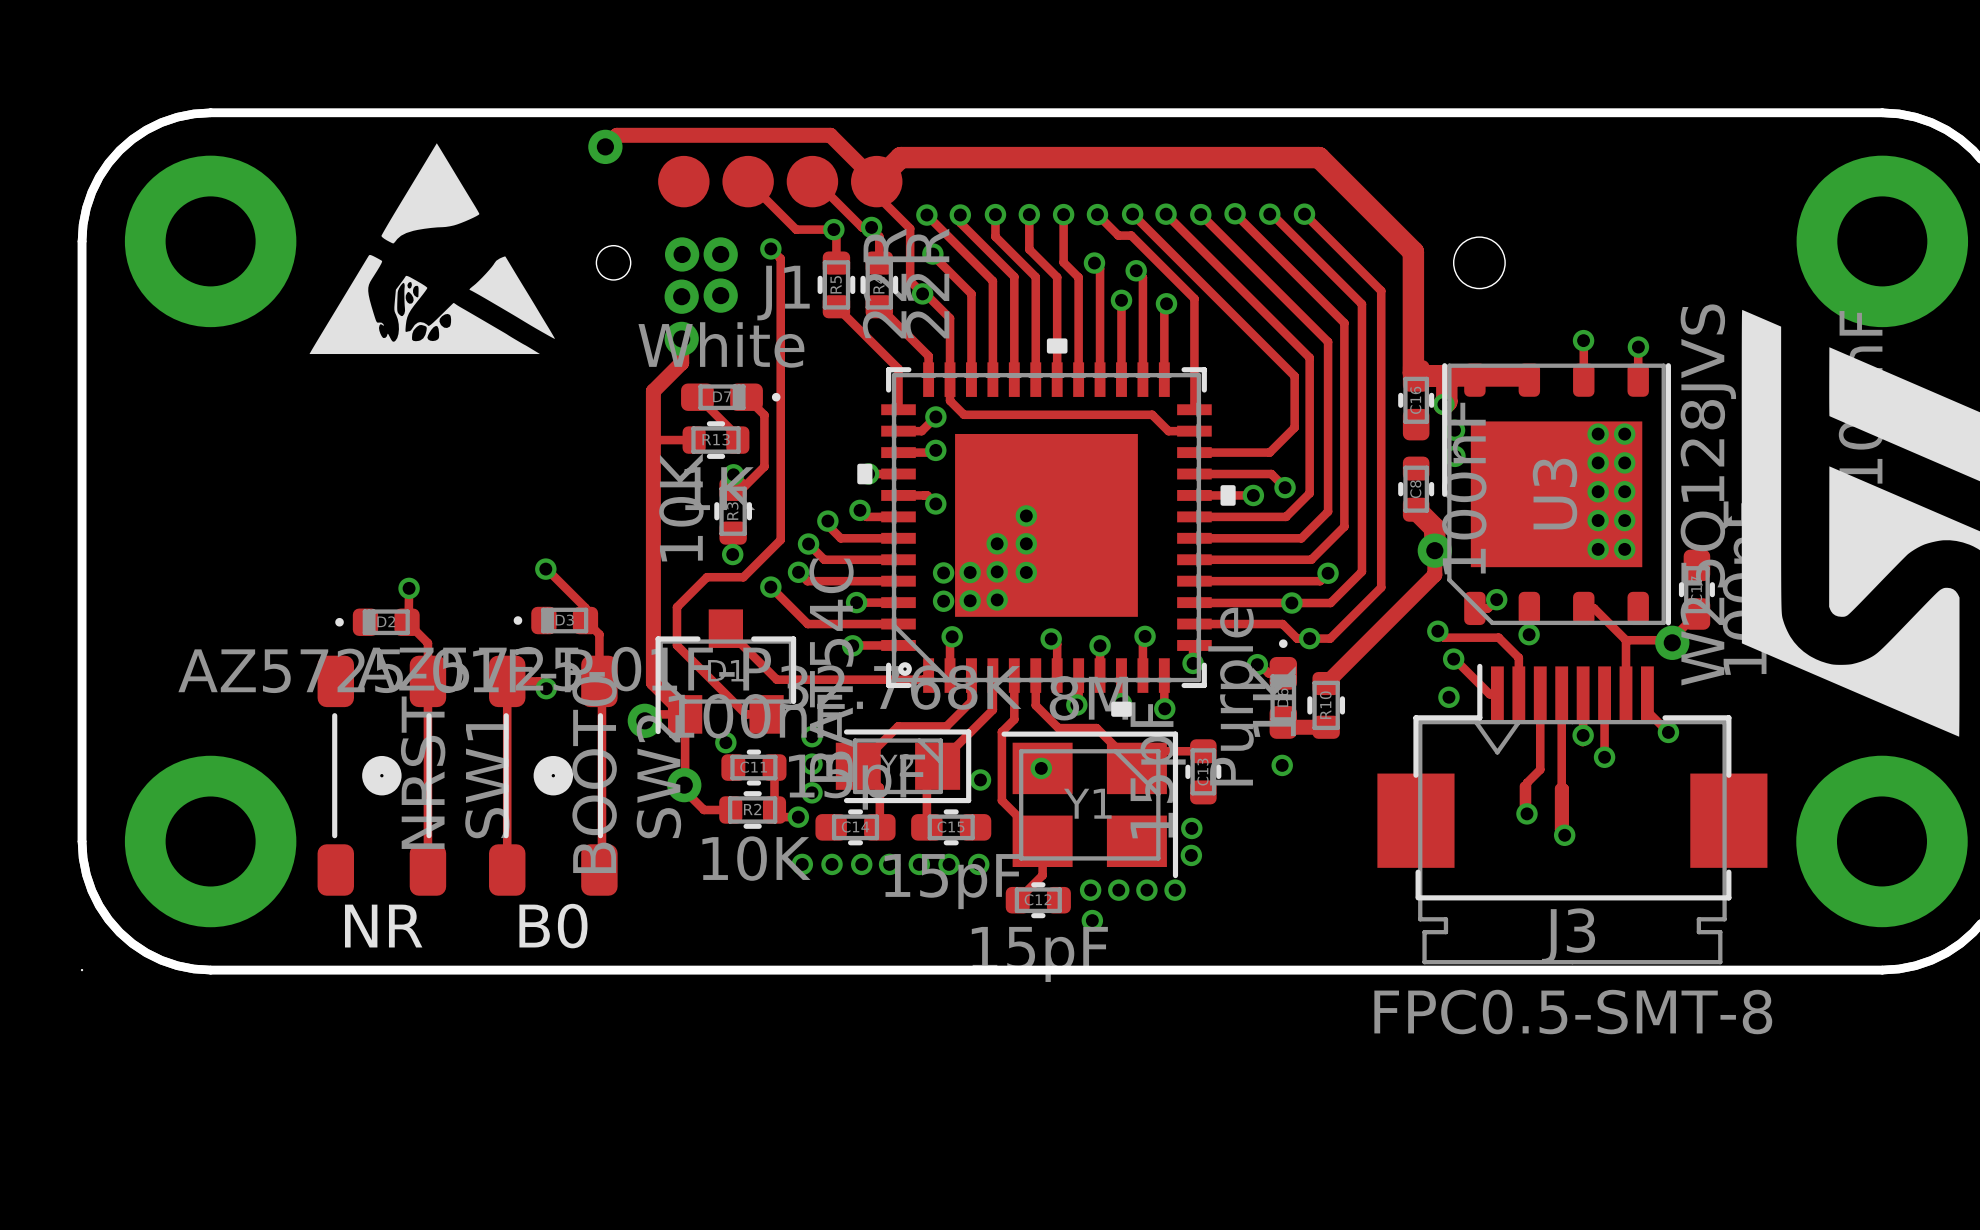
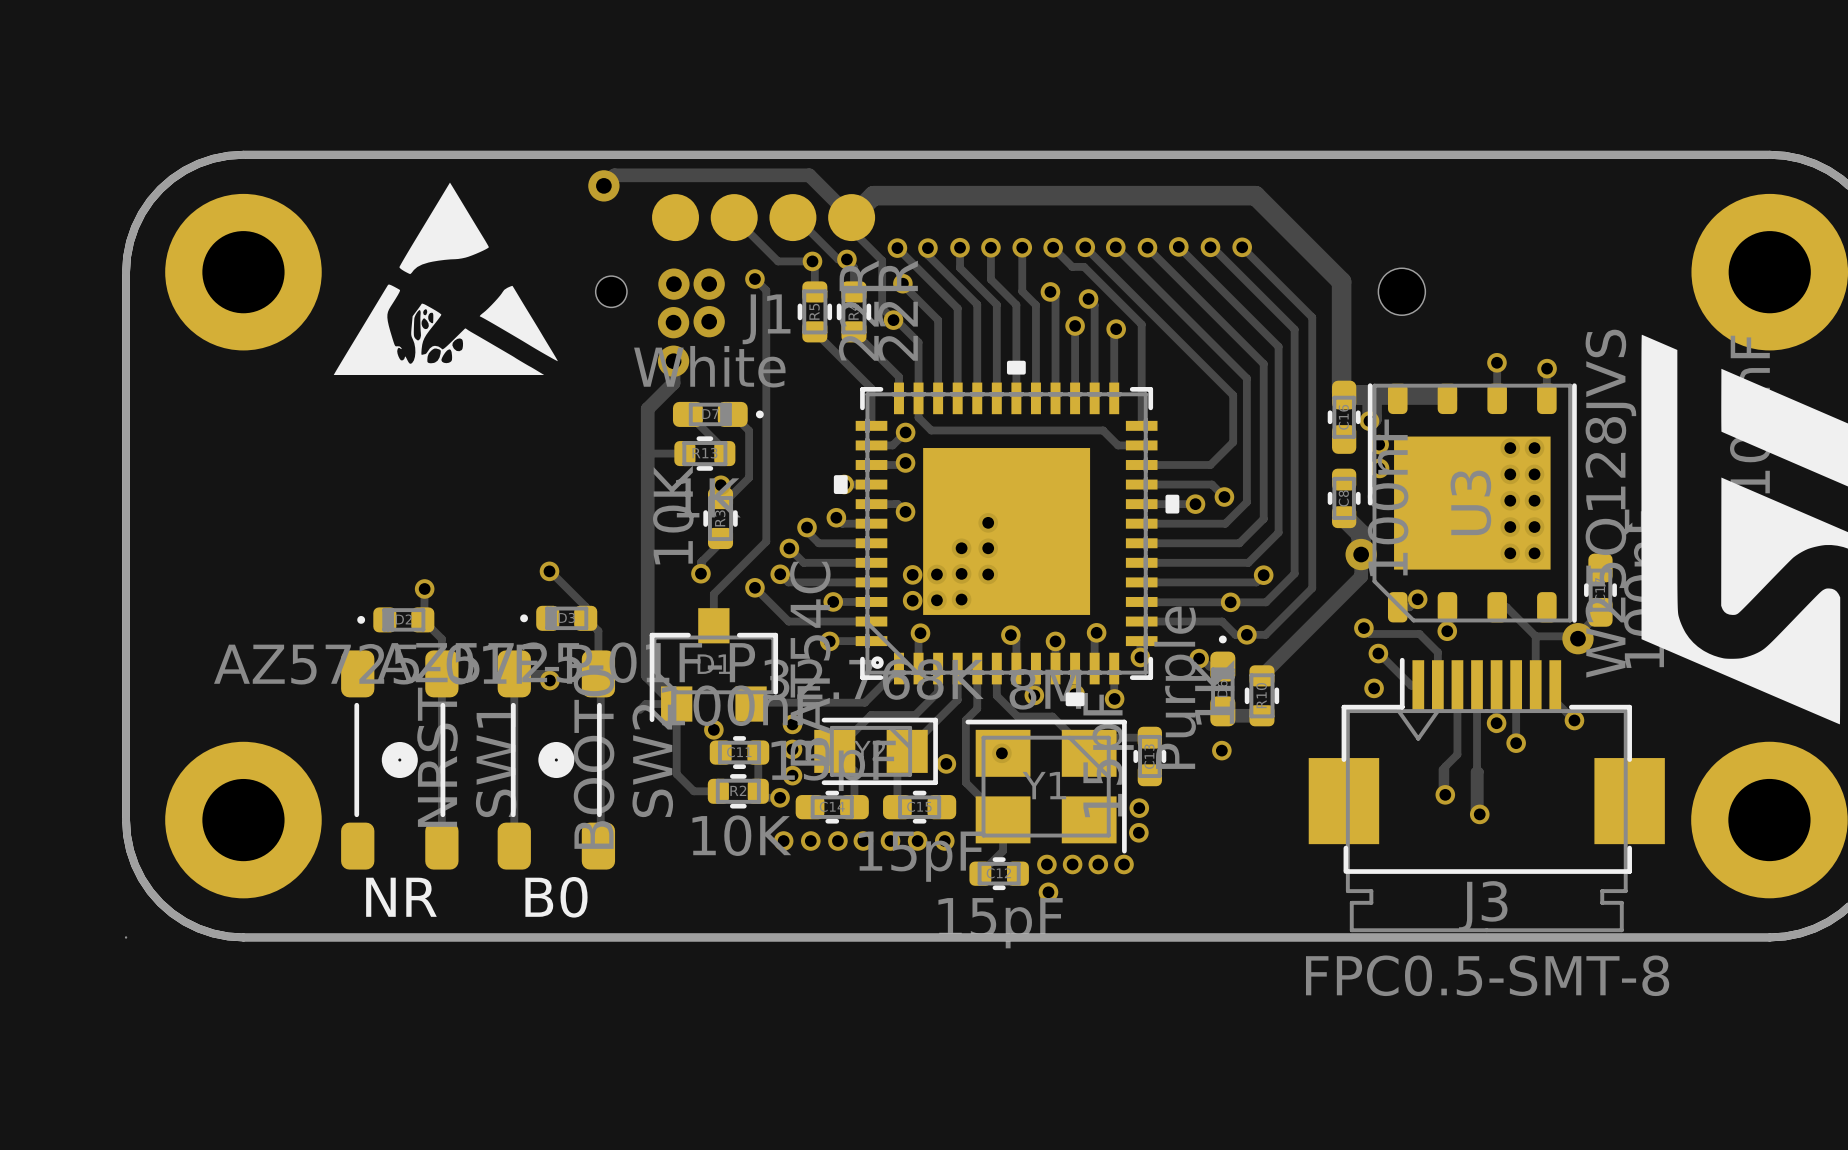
track: (780, 258) (780, 539) (743, 577) (706, 577) (676, 607) (676, 645) (745, 714) (766, 714) -> (763, 288) (766, 290) (766, 541) (713, 594) (713, 625)
track: none -> (720, 542) (700, 562) (700, 573) (702, 572) (702, 561)
via position: (732, 554) -> (700, 573)
track: (725, 628) (776, 679) (924, 679) -> (752, 702) (864, 702) (895, 672)
via: (644, 720) -> none
via: (684, 785) -> none

